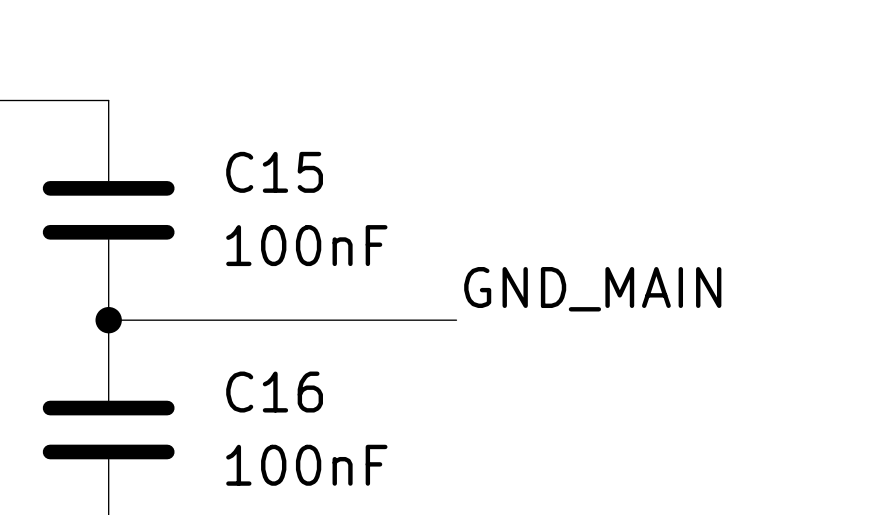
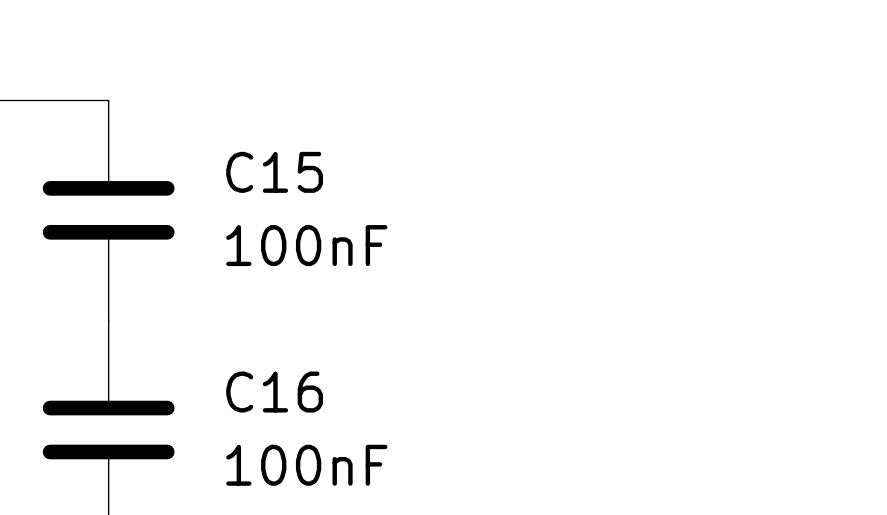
label: GND_MAIN (592, 289) -> none
wire: (108, 320) (456, 320) -> none
junction: (108, 320) -> none

